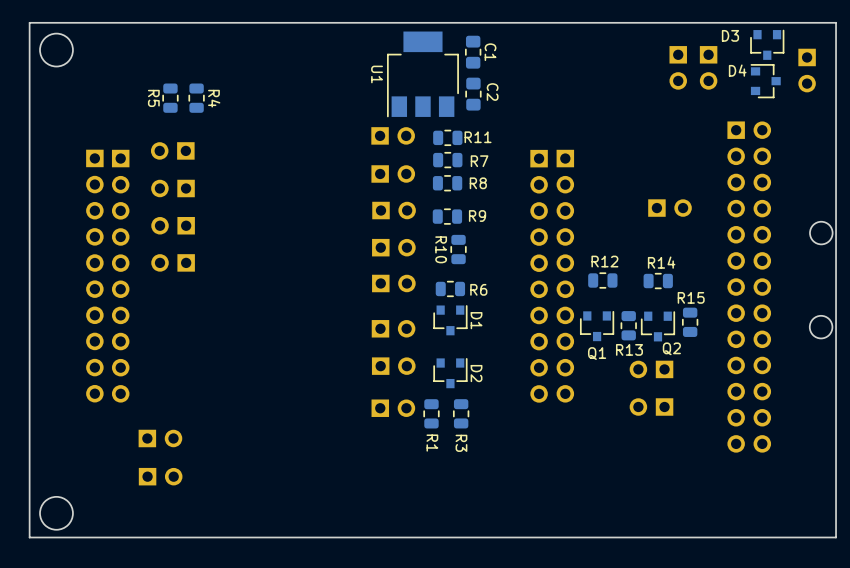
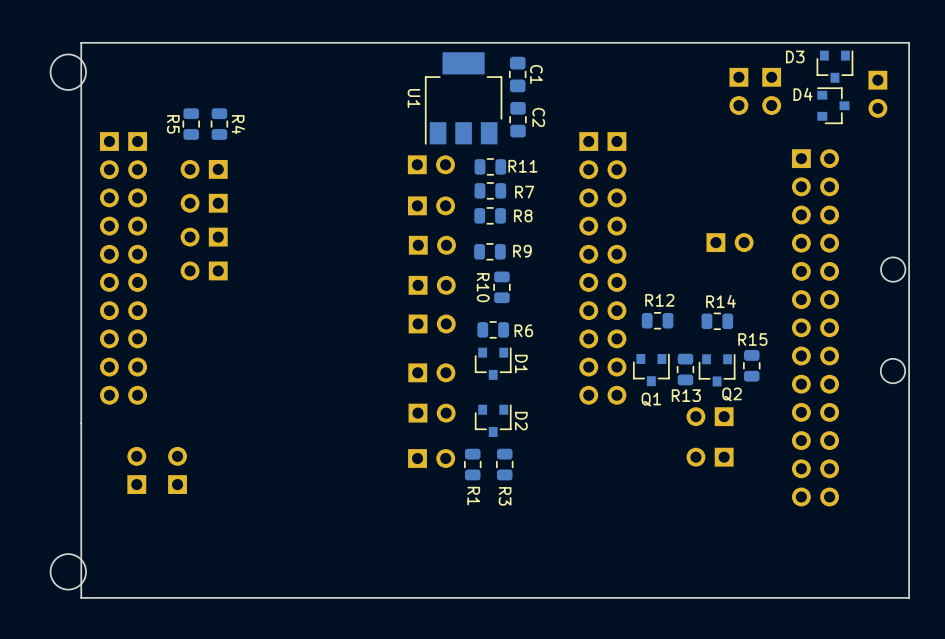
board edge: (29, 22) (29, 537) (836, 537) -> (81, 423) (81, 597) (909, 597)
board edge: (68, 22) (29, 22) -> (81, 42) (81, 423)
part: none -> (204, 169)
part: (172, 150) -> none
part: none -> (204, 203)
part: (172, 188) -> none
part: none -> (204, 237)
part: (173, 225) -> none
part: none -> (109, 268)
part: none -> (137, 268)
part: none -> (588, 268)
part: none -> (616, 268)
part: none -> (204, 270)
part: (173, 262) -> none
part: (94, 276) -> none
part: (120, 276) -> none
part: (539, 276) -> none
part: (565, 276) -> none
part: none -> (136, 470)
part rotation: 0° (160, 438) -> 90° counterclockwise (177, 470)
part: (160, 476) -> none

